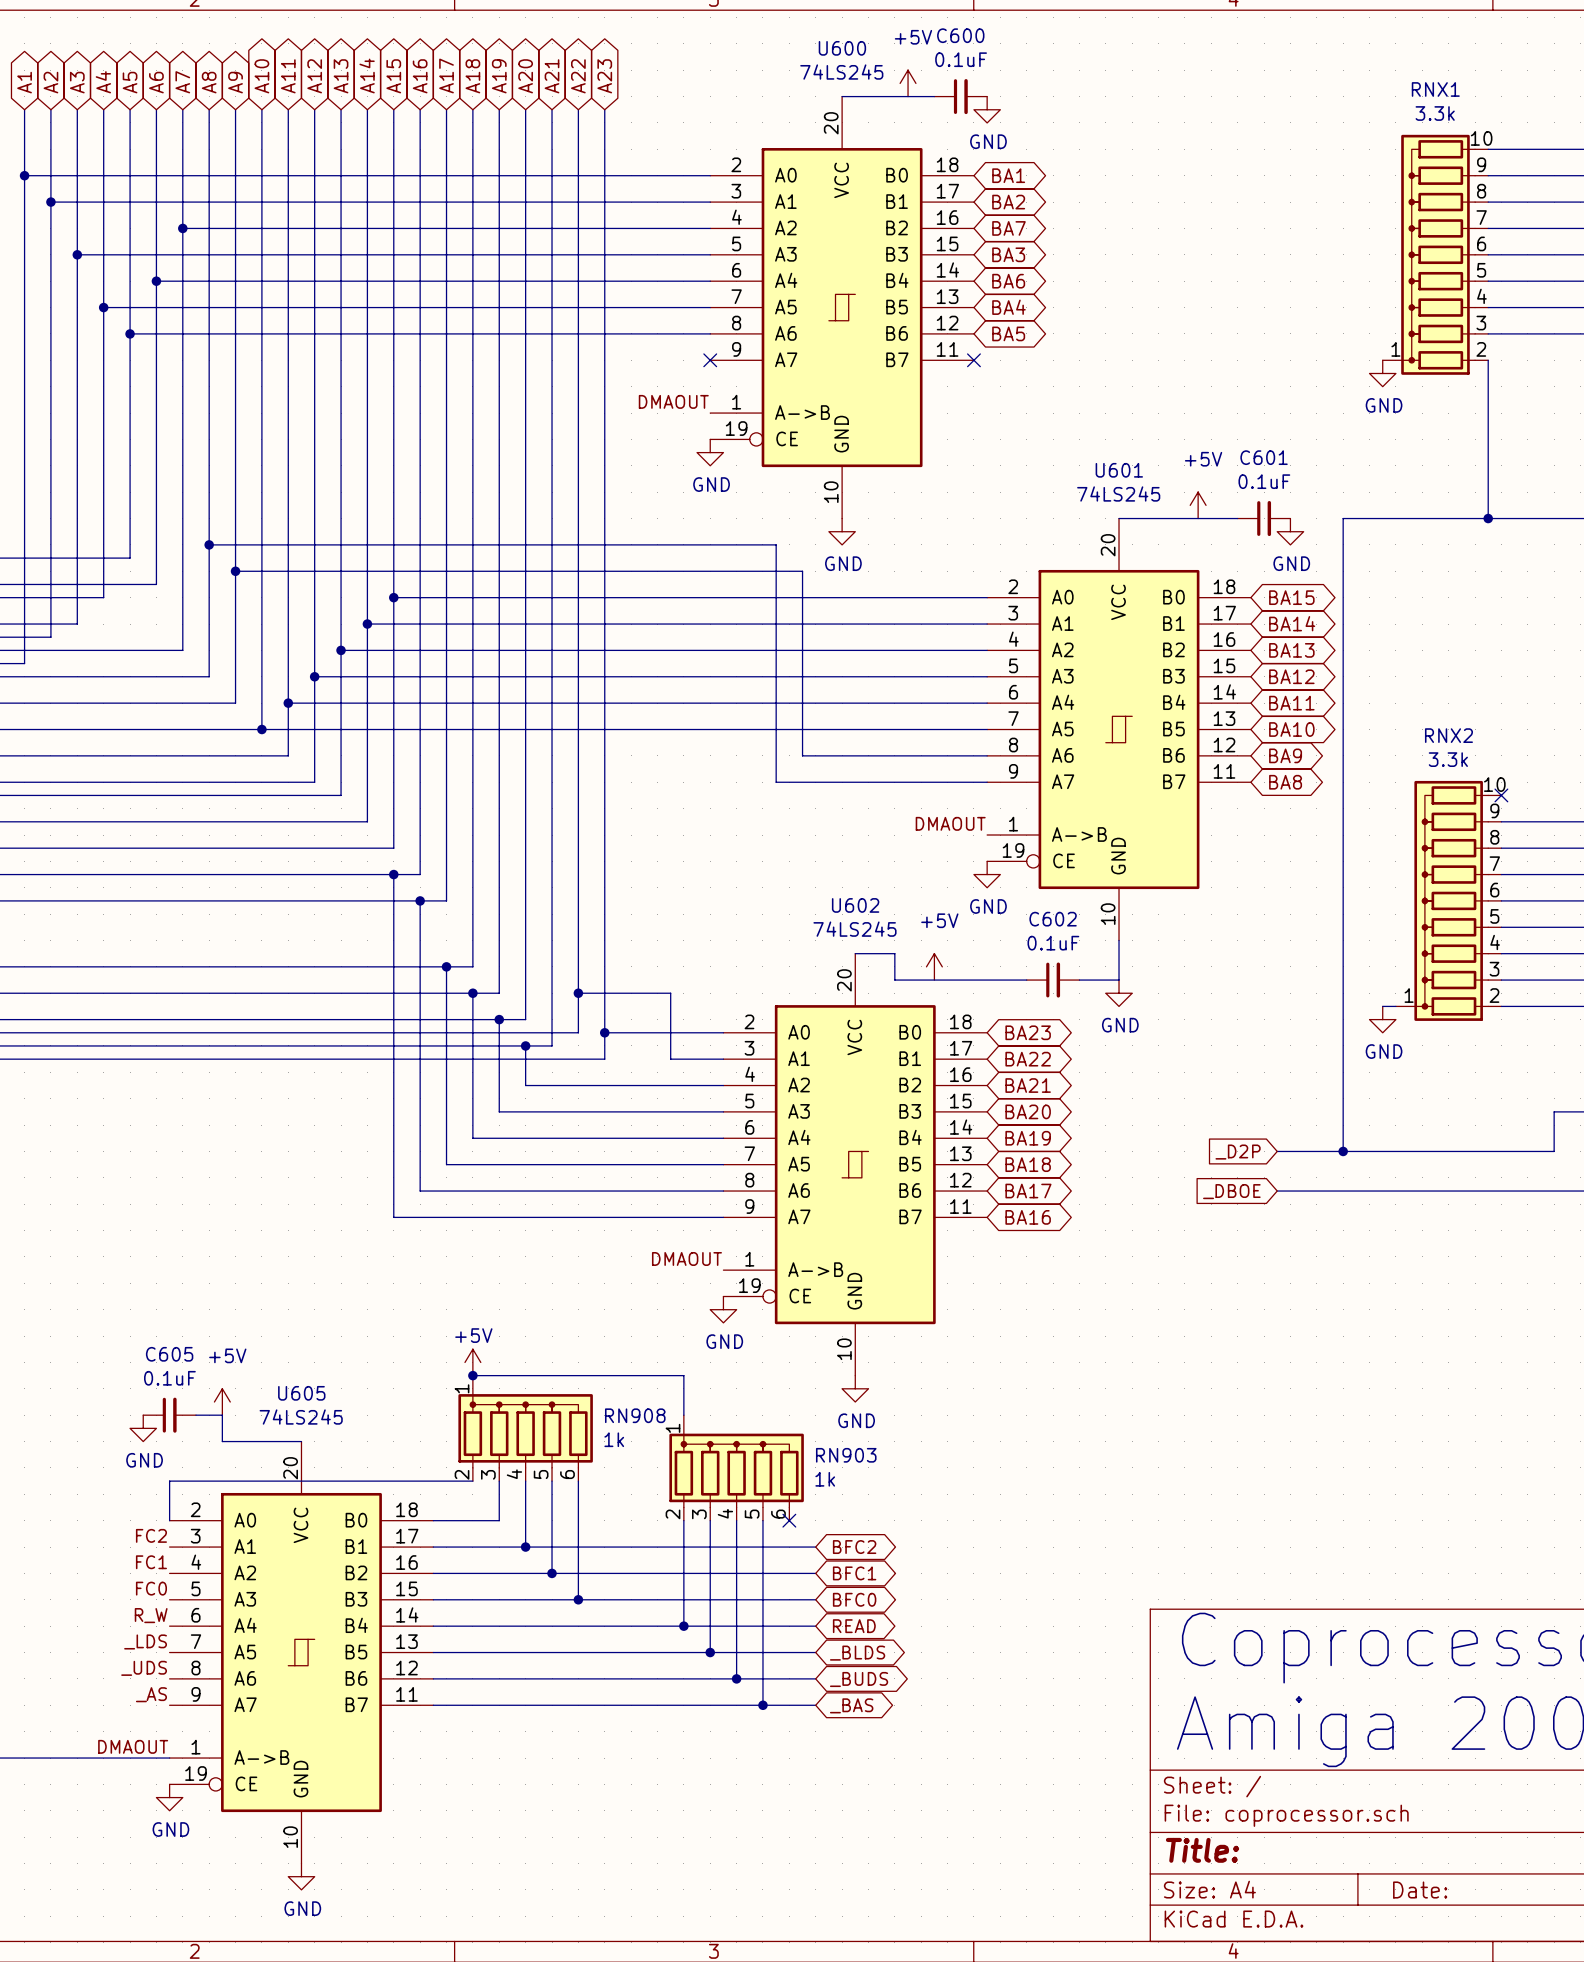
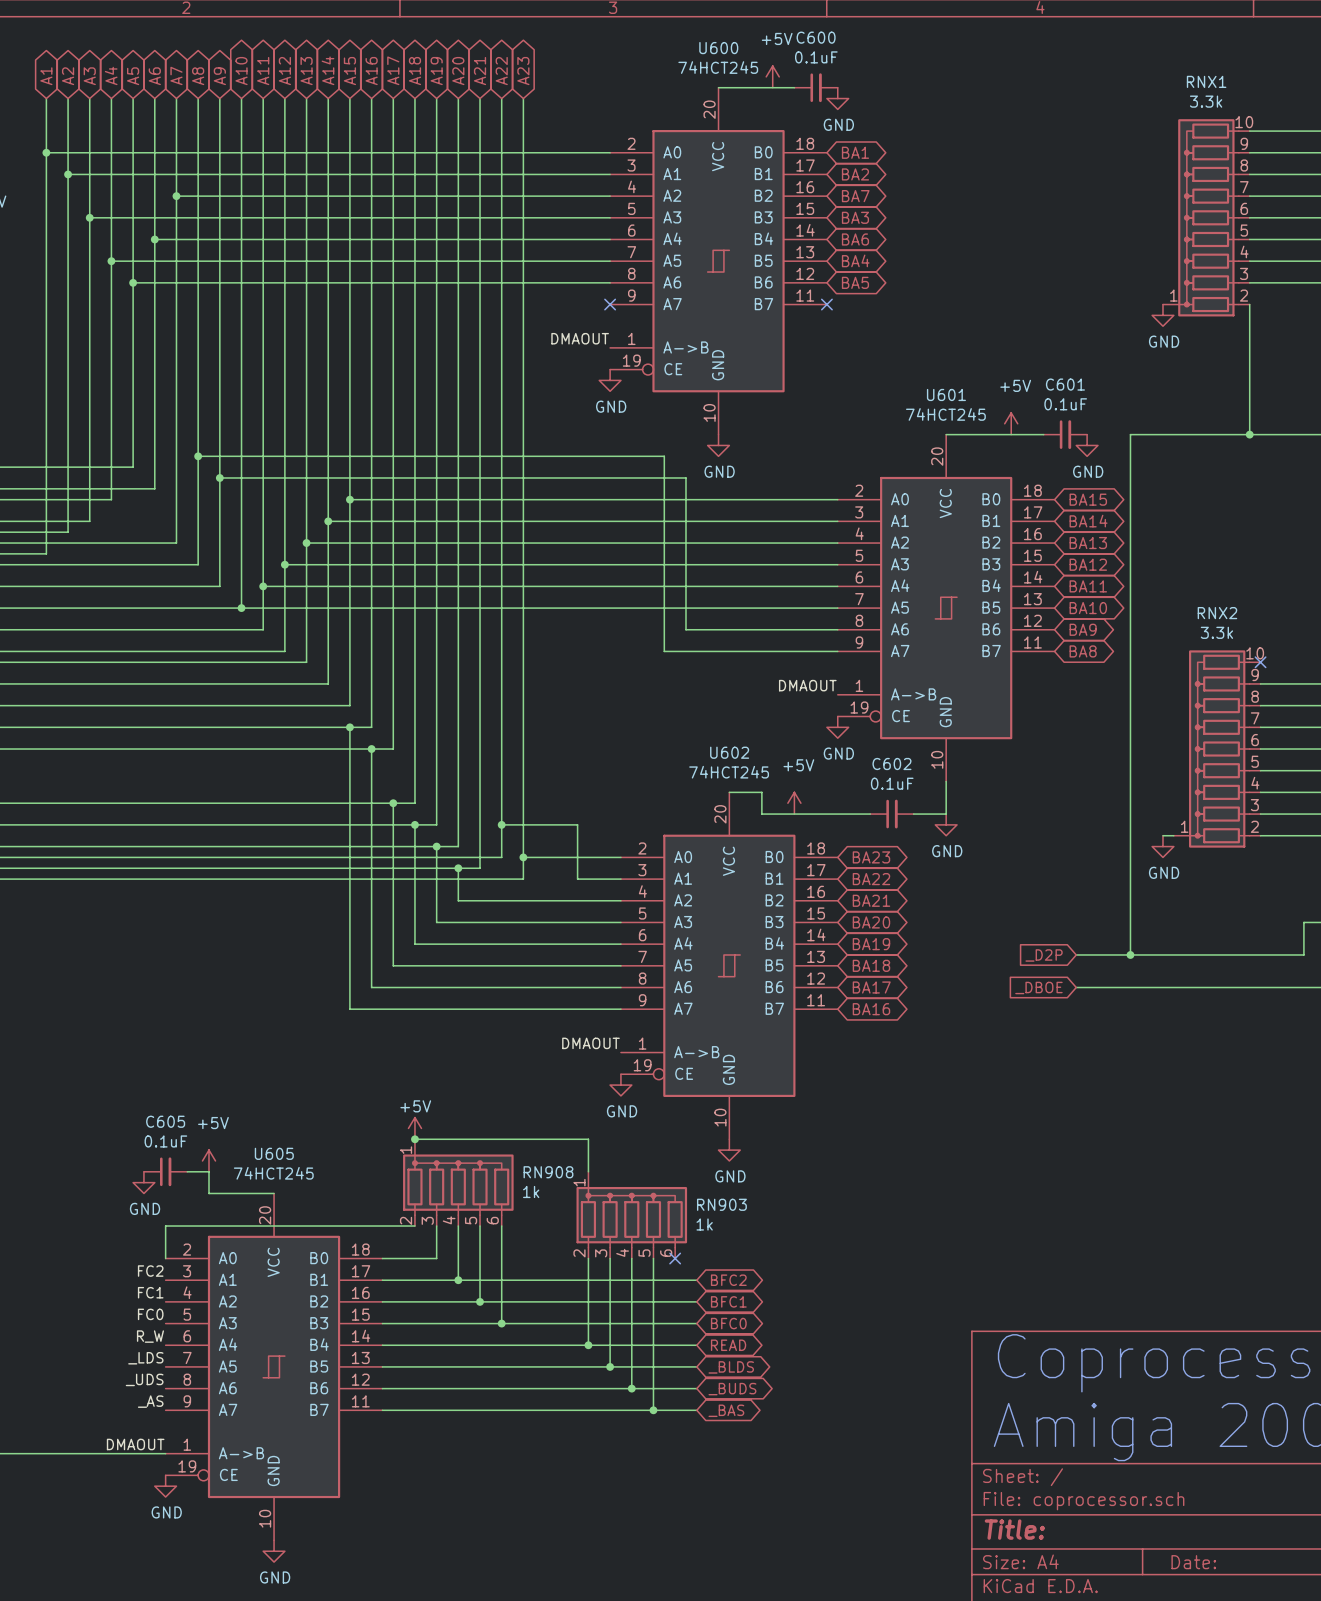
U600 value: 74LS245 (841, 72) -> 74HCT245 (718, 67)
U601 value: 74LS245 (1118, 493) -> 74HCT245 (945, 414)
U602 value: 74LS245 (854, 929) -> 74HCT245 (729, 772)
U605 value: 74LS245 (301, 1417) -> 74HCT245 (273, 1173)

